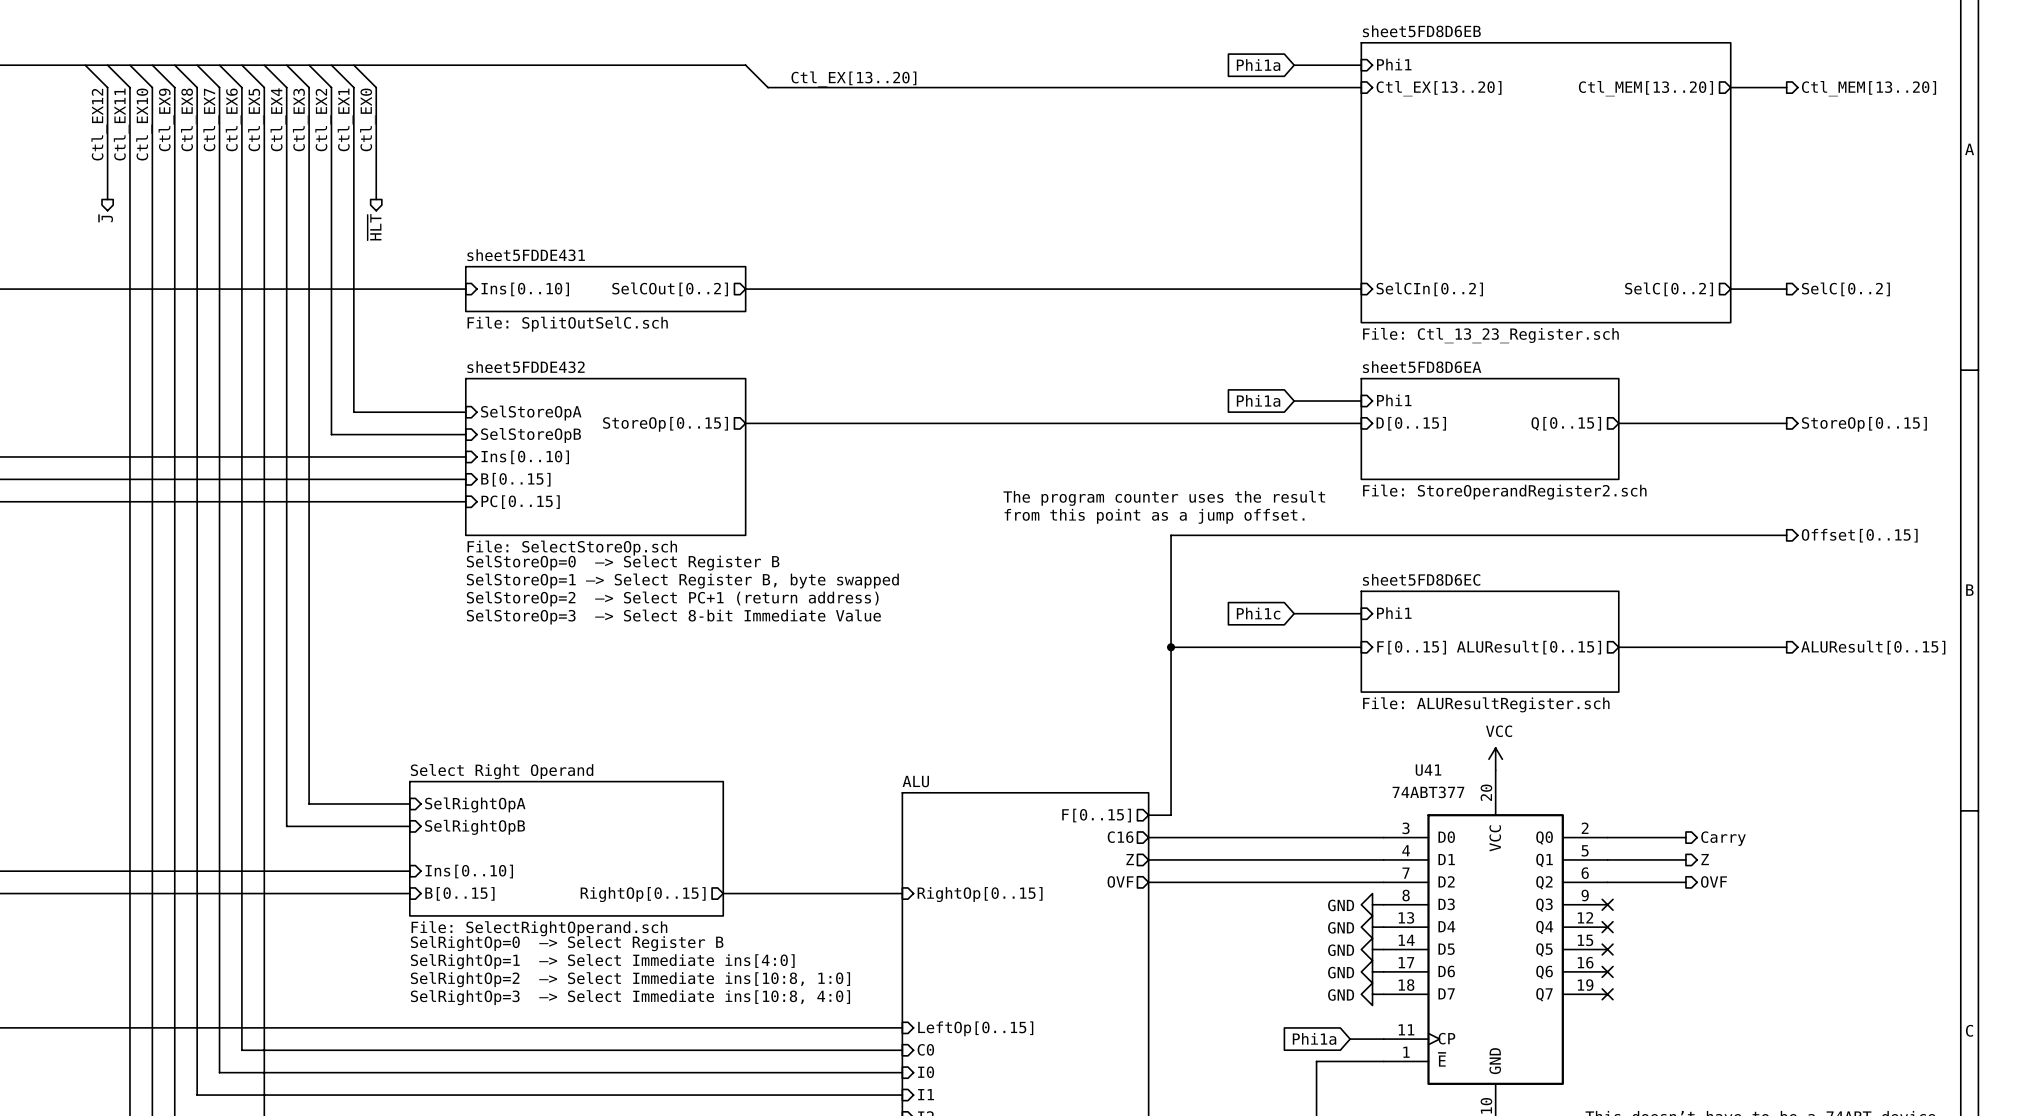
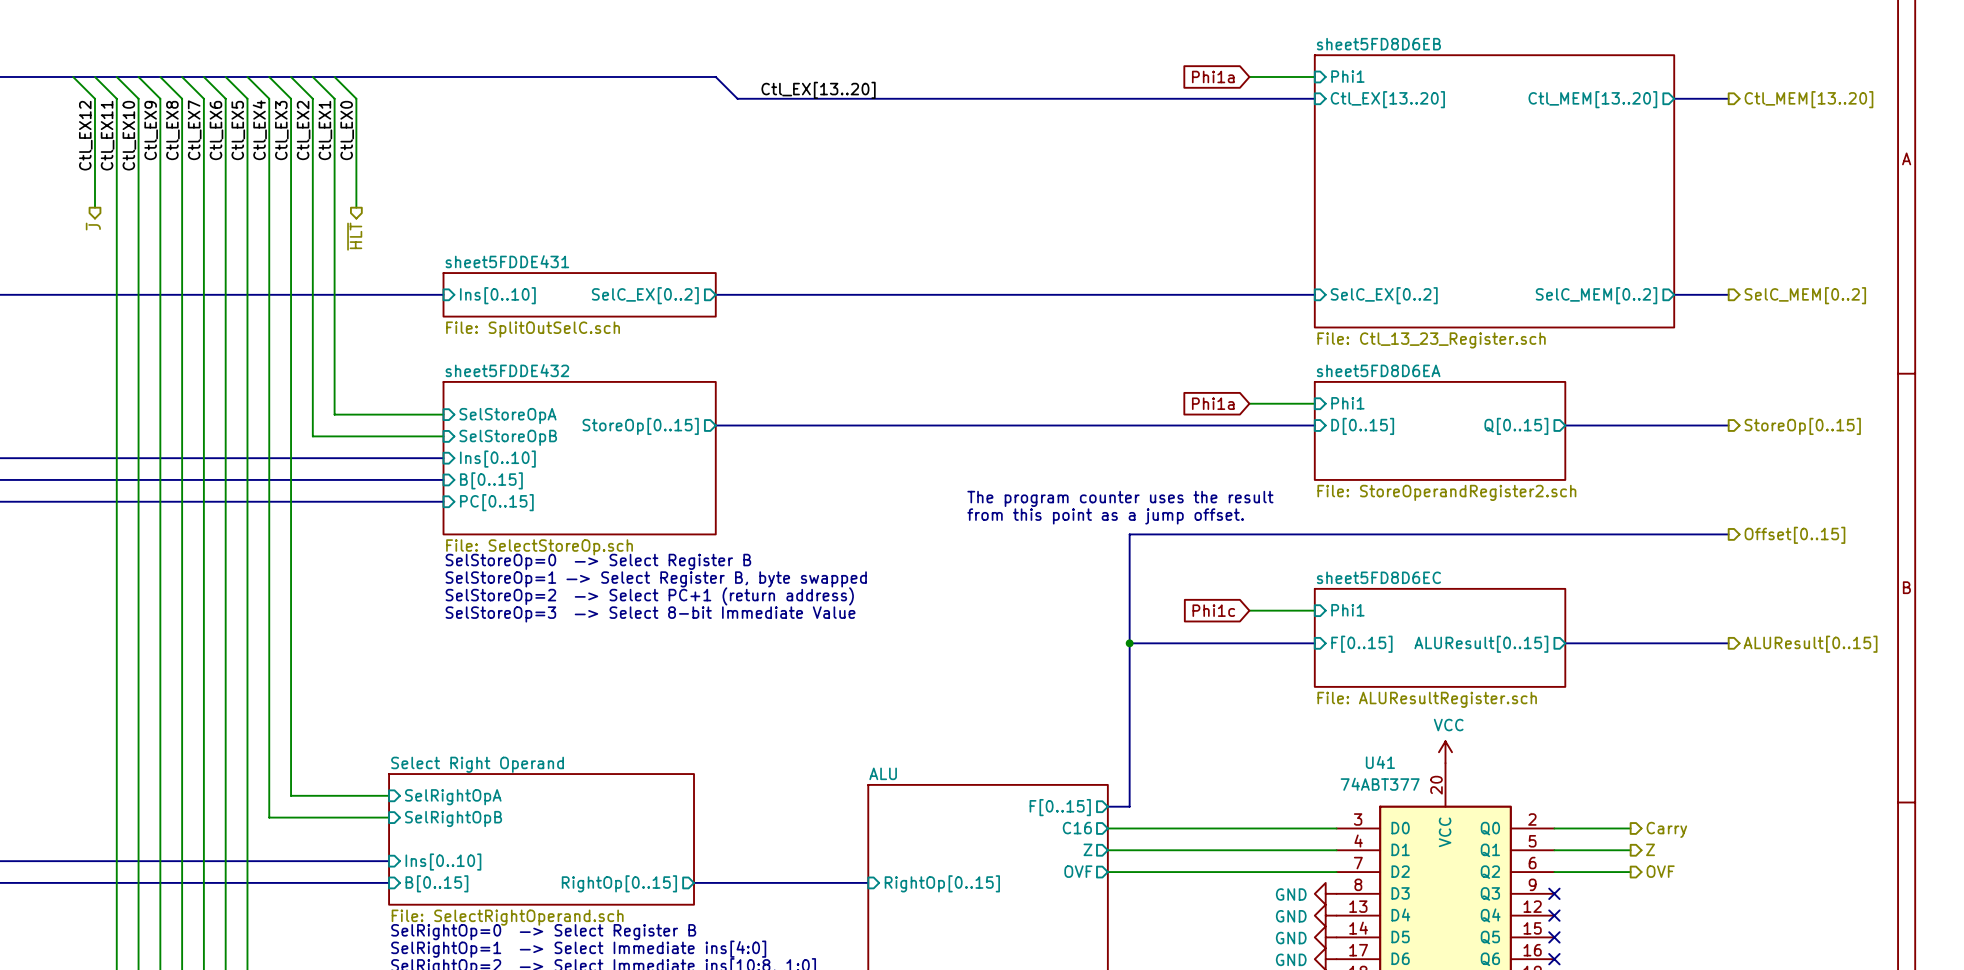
sheet pin: SelCOut[0..2] (670, 289) -> SelC_EX[0..2] (645, 295)
sheet pin: SelCIn[0..2] (1429, 289) -> SelC_EX[0..2] (1384, 295)
sheet pin: SelC[0..2] (1669, 289) -> SelC_MEM[0..2] (1596, 295)
hierarchical label: SelC[0..2] (1845, 289) -> SelC_MEM[0..2] (1805, 295)

